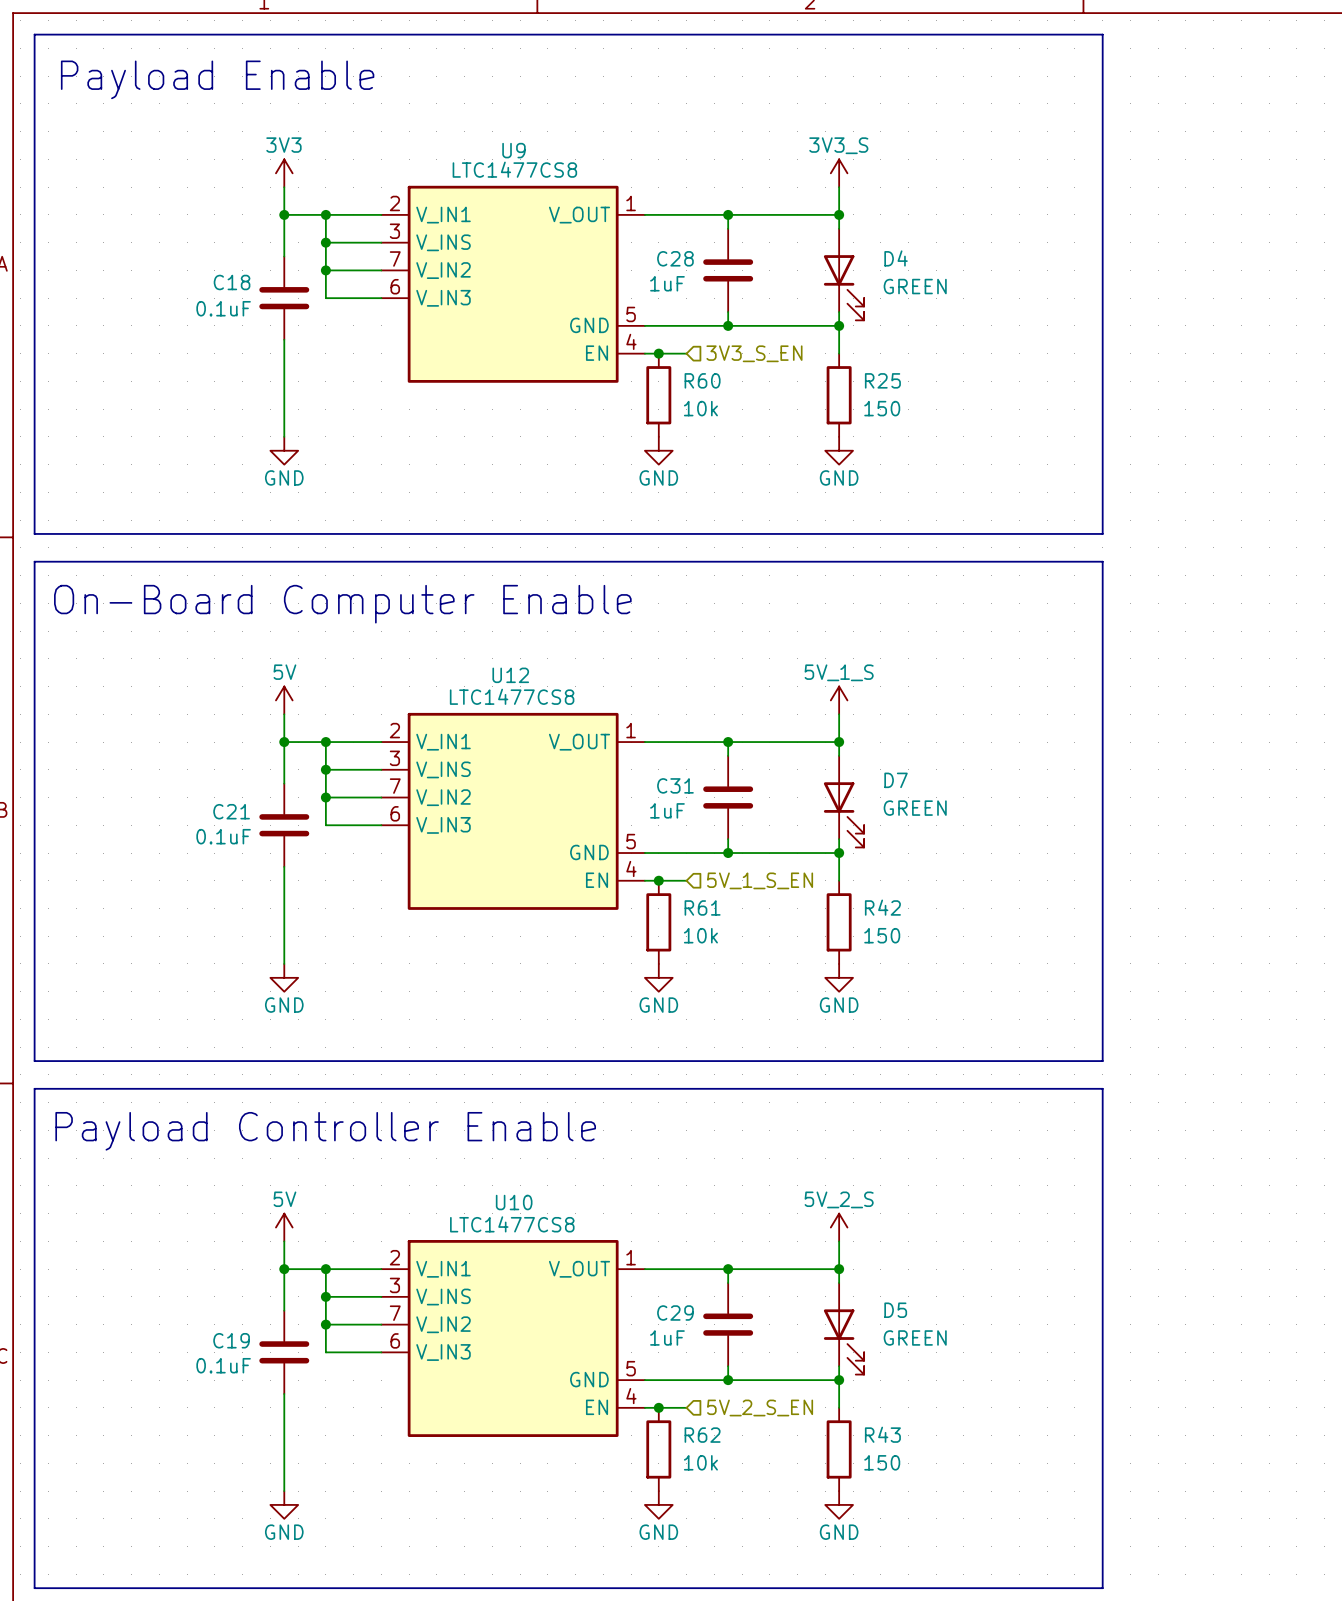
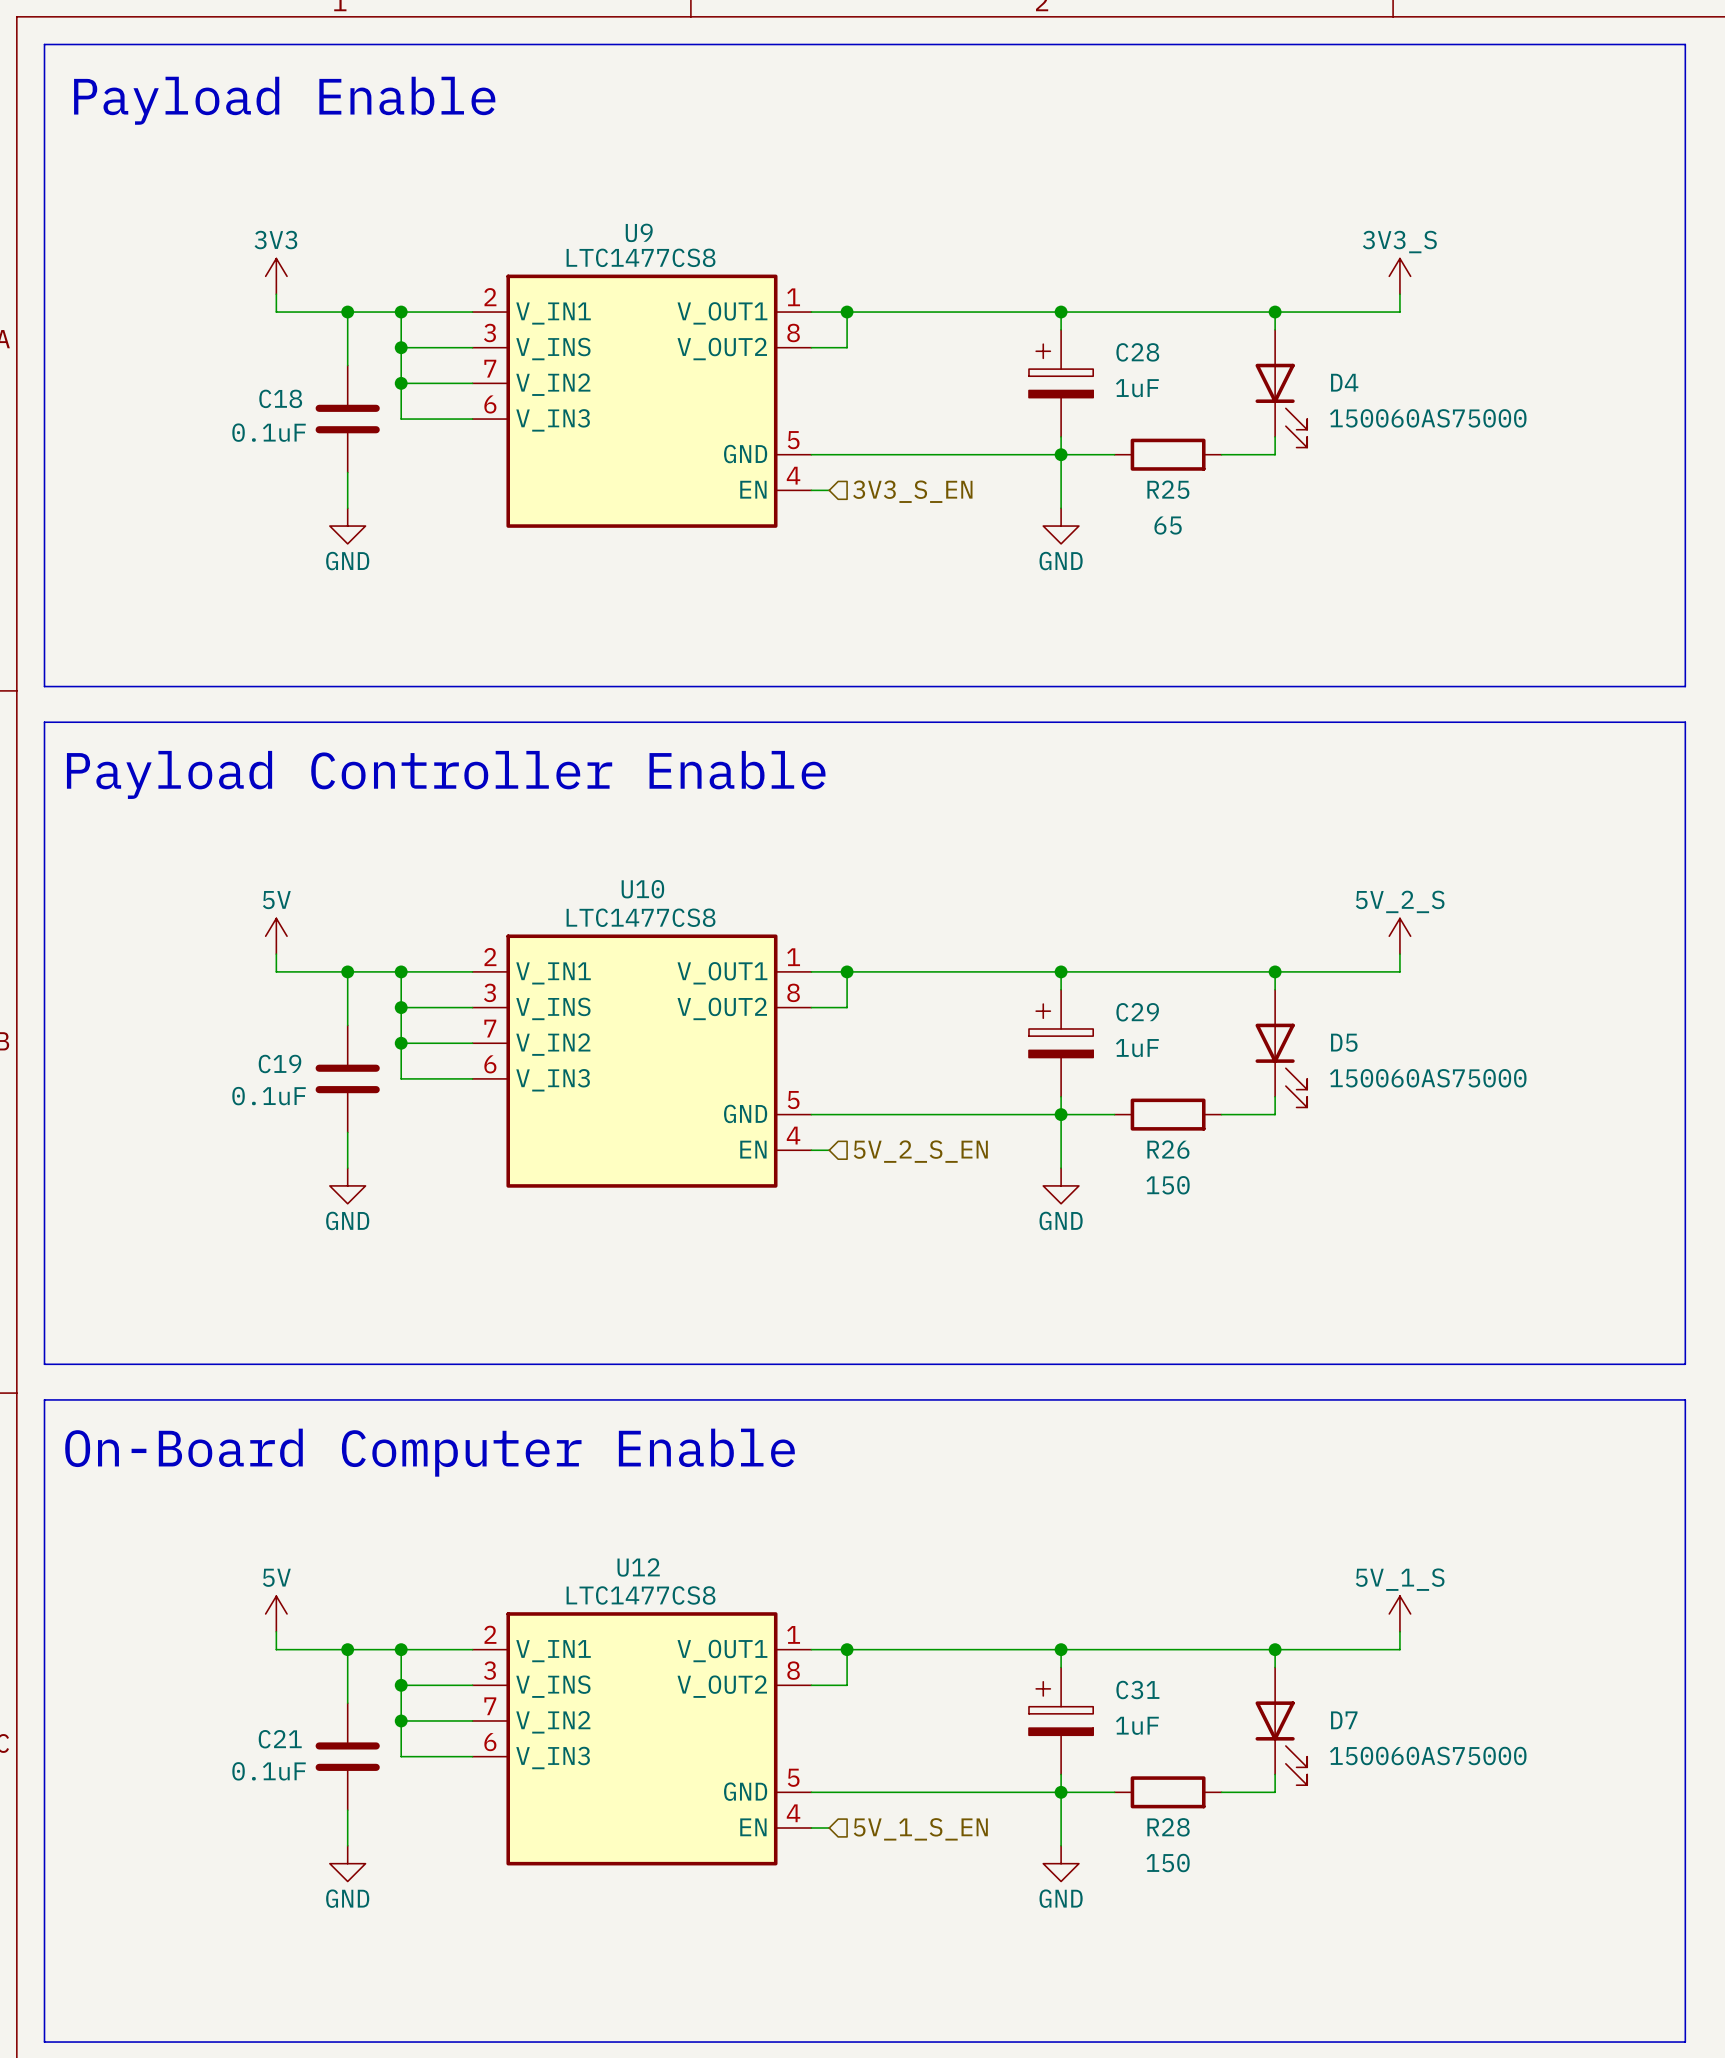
line: (1102, 34) (1102, 533) -> (1417, 44) (1685, 44) (1685, 686) (1417, 686)
power symbol position: 3V3 (284, 173) -> 3V3 (276, 276)
power symbol position: 3V3_S (839, 173) -> 3V3_S (1399, 276)
U9 symbol: [381, 185, 645, 383] -> [472, 274, 812, 528]
wire: (284, 187) (284, 256) -> none
wire: (839, 187) (839, 228) -> none
wire: (284, 214) (381, 214) -> none
junction: (284, 214) -> none
wire: (325, 214) (325, 298) -> (401, 383) (419, 383)
junction: (325, 214) -> none
wire: (644, 214) (839, 214) -> none
wire: (728, 214) (728, 228) -> (1061, 312) (1061, 329)
junction: (728, 214) -> none
junction position: (839, 214) -> (1061, 312)
wire: none -> (276, 294) (276, 312) (419, 312)
C28 symbol: [703, 228, 754, 313] -> [1028, 329, 1094, 437]
wire: none -> (1399, 294) (1399, 312) (811, 312)
wire: none -> (347, 312) (347, 365)
junction: none -> (347, 312)
wire: none -> (401, 312) (401, 419) (472, 419)
junction position: (325, 242) -> (401, 312)
wire: none -> (847, 312) (847, 347) (811, 347)
junction: none -> (847, 312)
junction: none -> (1275, 312)
C28 name position: C28 (675, 258) -> C28 (1137, 352)
D4 name position: D4 (896, 258) -> D4 (1344, 382)
junction position: (325, 270) -> (401, 347)
D4 position: (843, 274) -> (1281, 388)
C28 value position: 1uF (667, 283) -> 1uF (1137, 388)
D4 value: GREEN (915, 286) -> 150060AS75000 (1428, 418)
C18 position: (284, 298) -> (347, 419)
junction: none -> (401, 383)
wire: (728, 312) (728, 325) -> (1275, 312) (1275, 329)
wire: (839, 312) (839, 353) -> none
wire: (644, 325) (839, 325) -> none
junction: (728, 325) -> none
junction position: (839, 325) -> (1061, 454)
wire: (284, 339) (284, 436) -> none
wire: none -> (1061, 436) (1061, 508)
wire: none -> (1275, 436) (1275, 454) (1221, 454)
junction: (658, 353) -> none
wire: none -> (882, 454) (1114, 454)
hierarchical label position: 3V3_S_EN (754, 353) -> 3V3_S_EN (912, 491)
wire: none -> (347, 472) (347, 508)
R25 name position: R25 (882, 380) -> R25 (1168, 489)
wire: none -> (811, 490) (829, 490)
R60: 10k (658, 395) -> none
R25 rotation: 0° (839, 395) -> 90° clockwise (1168, 454)
R25 position: (839, 395) -> (1168, 454)
R25 value: 150 (882, 408) -> 65 (1168, 525)
power symbol position: GND (284, 450) -> GND (347, 526)
power symbol: GND (658, 450) -> none
power symbol position: GND (839, 450) -> GND (1061, 526)
line: (1102, 561) (1102, 1061) -> (1417, 722) (1685, 722) (1685, 1364) (1417, 1364)
text: On-Board Computer Enable (342, 604) -> Payload Controller Enable (446, 774)
power symbol position: 5V (284, 700) -> 5V (276, 936)
power symbol: 5V_1_S (839, 700) -> none
U12 symbol: [381, 712, 645, 910] -> [472, 1612, 812, 1866]
wire: (284, 714) (284, 783) -> none
wire: (839, 714) (839, 755) -> none
power symbol: none -> 5V_2_S (1399, 936)
wire: none -> (276, 954) (276, 971) (472, 971)
wire: (284, 742) (381, 742) -> none
junction: (284, 742) -> none
wire: (325, 742) (325, 825) (381, 825) -> (401, 971) (401, 1078) (472, 1078)
junction: (325, 742) -> none
wire: (644, 742) (839, 742) -> none
wire: (728, 742) (728, 755) -> (1061, 971) (1061, 989)
junction: (728, 742) -> none
junction position: (839, 742) -> (1061, 971)
wire: none -> (1399, 954) (1399, 971) (811, 971)
wire: none -> (347, 971) (347, 1025)
junction: none -> (347, 971)
junction: none -> (401, 971)
wire: none -> (847, 971) (847, 1007) (811, 1007)
junction: none -> (847, 971)
C31 symbol: [703, 755, 754, 840] -> [1028, 1667, 1094, 1775]
wire: none -> (1275, 971) (1275, 989)
junction: none -> (1275, 971)
wire: (325, 769) (381, 769) -> (401, 1007) (472, 1007)
junction: (325, 769) -> none
D7 name position: D7 (896, 780) -> D7 (1344, 1720)
junction: none -> (401, 1007)
C31 name position: C31 (675, 785) -> C31 (1137, 1690)
wire: (325, 797) (381, 797) -> (401, 1043) (472, 1043)
junction: (325, 797) -> none
D7 position: (843, 801) -> (1281, 1726)
D7 value: GREEN (915, 808) -> 150060AS75000 (1428, 1755)
C31 value position: 1uF (667, 810) -> 1uF (1137, 1725)
junction: none -> (401, 1043)
C21 position: (284, 825) -> (347, 1756)
wire: (728, 839) (728, 853) -> none
wire: (839, 839) (839, 880) -> none
wire: (644, 853) (839, 853) -> none
junction: (728, 853) -> none
wire: none -> (1061, 1096) (1061, 1168)
junction position: (839, 853) -> (1061, 1114)
wire: none -> (1275, 1096) (1275, 1114) (1221, 1114)
wire: (284, 866) (284, 963) -> none
wire: none -> (811, 1114) (1114, 1114)
R26: none -> 150 (1168, 1114)
wire: none -> (347, 1132) (347, 1168)
wire: (644, 880) (686, 880) -> none
junction: (658, 880) -> none
hierarchical label: 5V_1_S_EN (760, 880) -> 5V_2_S_EN (920, 1151)
wire: none -> (811, 1150) (829, 1150)
R61: 10k (658, 922) -> none
R42: 150 (839, 922) -> none
power symbol position: GND (284, 977) -> GND (347, 1185)
power symbol: GND (658, 977) -> none
power symbol position: GND (839, 977) -> GND (1061, 1185)
line: (1102, 1088) (1102, 1588) -> (1417, 1399) (1685, 1399) (1685, 2042) (1417, 2042)
text: Payload Controller Enable (325, 1131) -> On-Board Computer Enable (430, 1452)
power symbol position: 5V (284, 1227) -> 5V (276, 1613)
power symbol: 5V_2_S (839, 1227) -> none
U10 symbol: [381, 1240, 645, 1437] -> [472, 934, 812, 1188]
wire: (284, 1241) (284, 1310) -> none
wire: (839, 1241) (839, 1283) -> none
power symbol: none -> 5V_1_S (1399, 1613)
wire: none -> (276, 1631) (276, 1649) (472, 1649)
wire: (284, 1269) (381, 1269) -> none
junction: (284, 1269) -> none
wire: (325, 1269) (325, 1352) (381, 1352) -> (401, 1649) (401, 1756) (472, 1756)
junction: (325, 1269) -> none
wire: (644, 1269) (839, 1269) -> none
wire: (728, 1269) (728, 1283) -> (1061, 1649) (1061, 1667)
junction: (728, 1269) -> none
junction position: (839, 1269) -> (1061, 1649)
wire: none -> (1399, 1631) (1399, 1649) (811, 1649)
wire: none -> (347, 1649) (347, 1703)
junction: none -> (347, 1649)
junction: none -> (401, 1649)
wire: none -> (847, 1649) (847, 1685) (811, 1685)
junction: none -> (847, 1649)
C29 symbol: [703, 1283, 754, 1367] -> [1028, 989, 1094, 1097]
wire: none -> (1275, 1649) (1275, 1667)
junction: none -> (1275, 1649)
wire: (325, 1296) (381, 1296) -> (401, 1685) (472, 1685)
junction: (325, 1296) -> none
junction: none -> (401, 1685)
D5 name position: D5 (895, 1310) -> D5 (1344, 1042)
C29 name position: C29 (675, 1313) -> C29 (1137, 1012)
wire: (325, 1324) (381, 1324) -> (401, 1720) (472, 1720)
junction: (325, 1324) -> none
D5 position: (843, 1328) -> (1281, 1048)
C29 value position: 1uF (667, 1337) -> 1uF (1137, 1048)
D5 value: GREEN (915, 1337) -> 150060AS75000 (1428, 1078)
junction: none -> (401, 1720)
C19 position: (284, 1352) -> (347, 1078)
wire: (728, 1366) (728, 1380) -> none
wire: (839, 1366) (839, 1407) -> none
wire: (644, 1380) (839, 1380) -> none
junction: (728, 1380) -> none
wire: none -> (1061, 1774) (1061, 1845)
junction position: (839, 1380) -> (1061, 1792)
wire: none -> (1275, 1774) (1275, 1792) (1221, 1792)
wire: (284, 1393) (284, 1491) -> none
wire: none -> (811, 1792) (1114, 1792)
R28: none -> 150 (1168, 1792)
wire: none -> (347, 1810) (347, 1845)
wire: (644, 1407) (686, 1407) -> none
junction: (658, 1407) -> none
hierarchical label: 5V_2_S_EN (760, 1407) -> 5V_1_S_EN (920, 1829)
wire: none -> (811, 1828) (829, 1828)
R62: 10k (658, 1449) -> none
R43: 150 (839, 1449) -> none
power symbol position: GND (284, 1504) -> GND (347, 1863)
power symbol: GND (658, 1504) -> none
power symbol position: GND (839, 1504) -> GND (1061, 1863)

